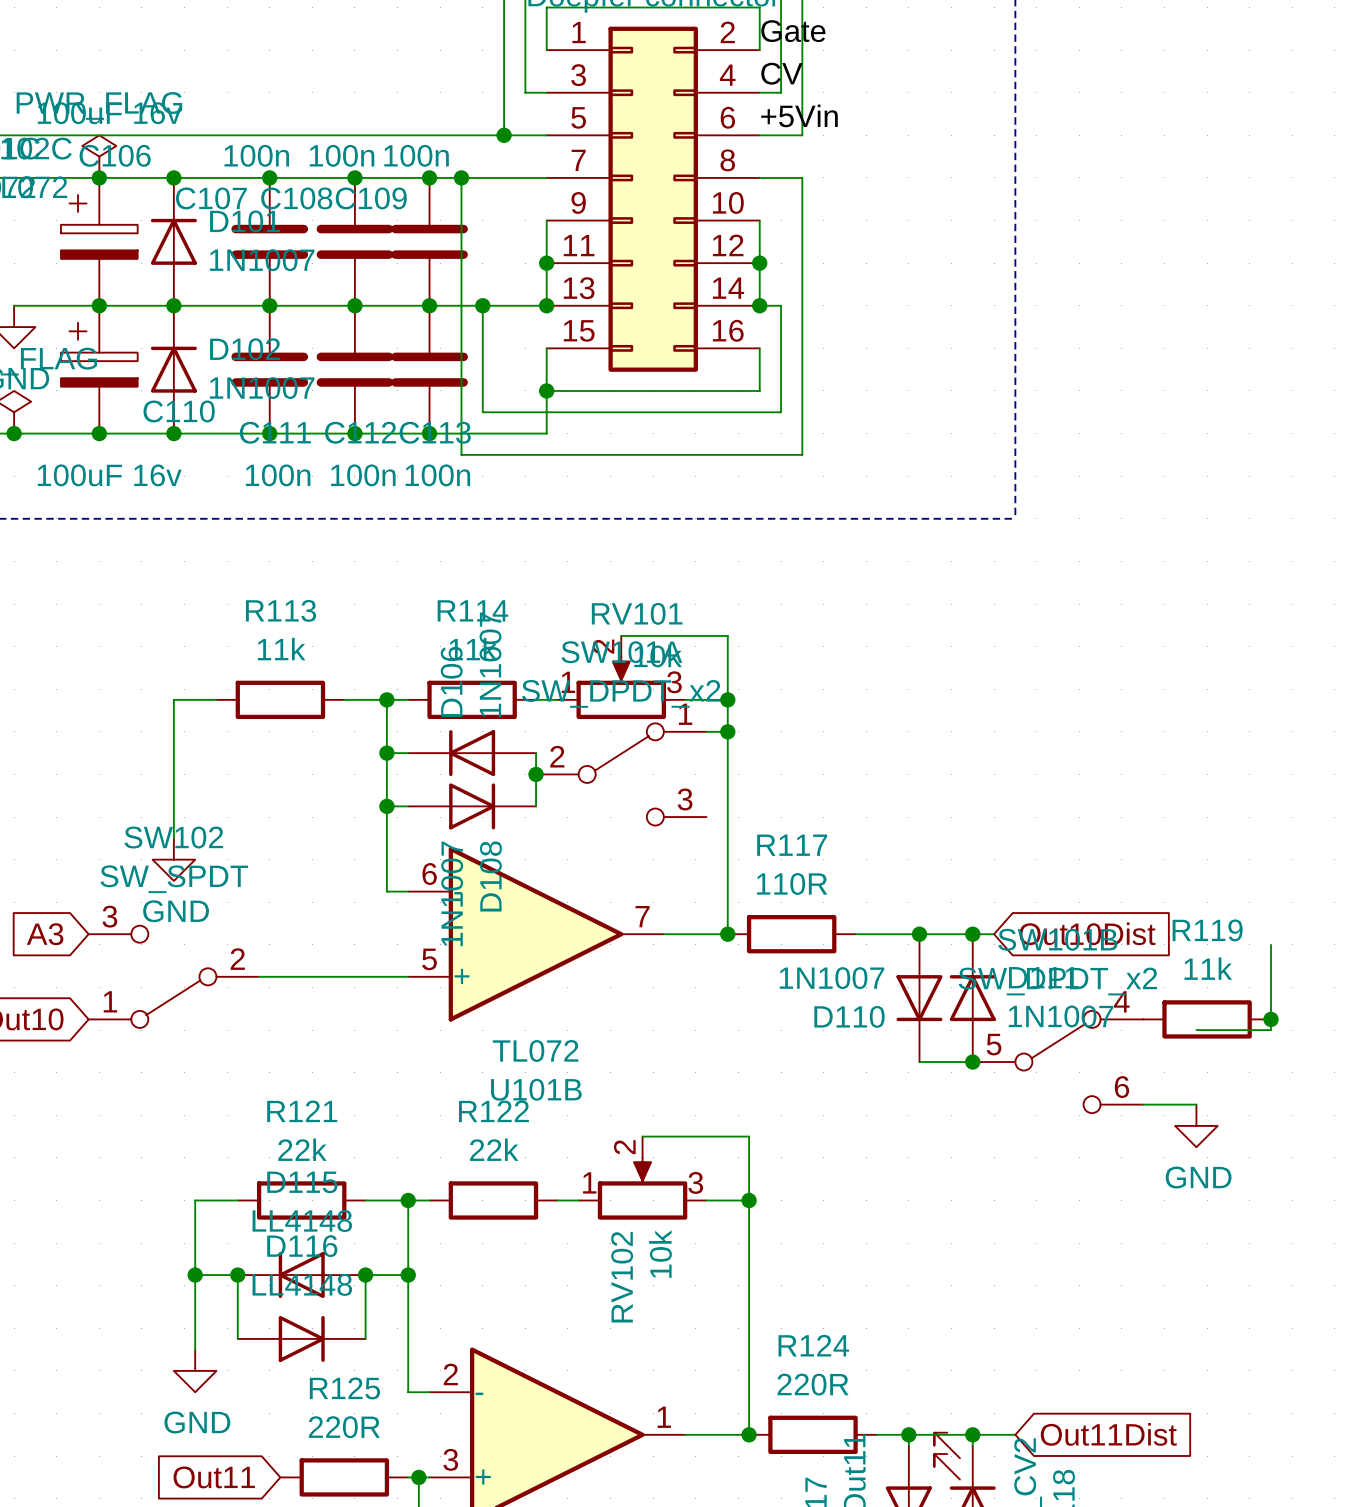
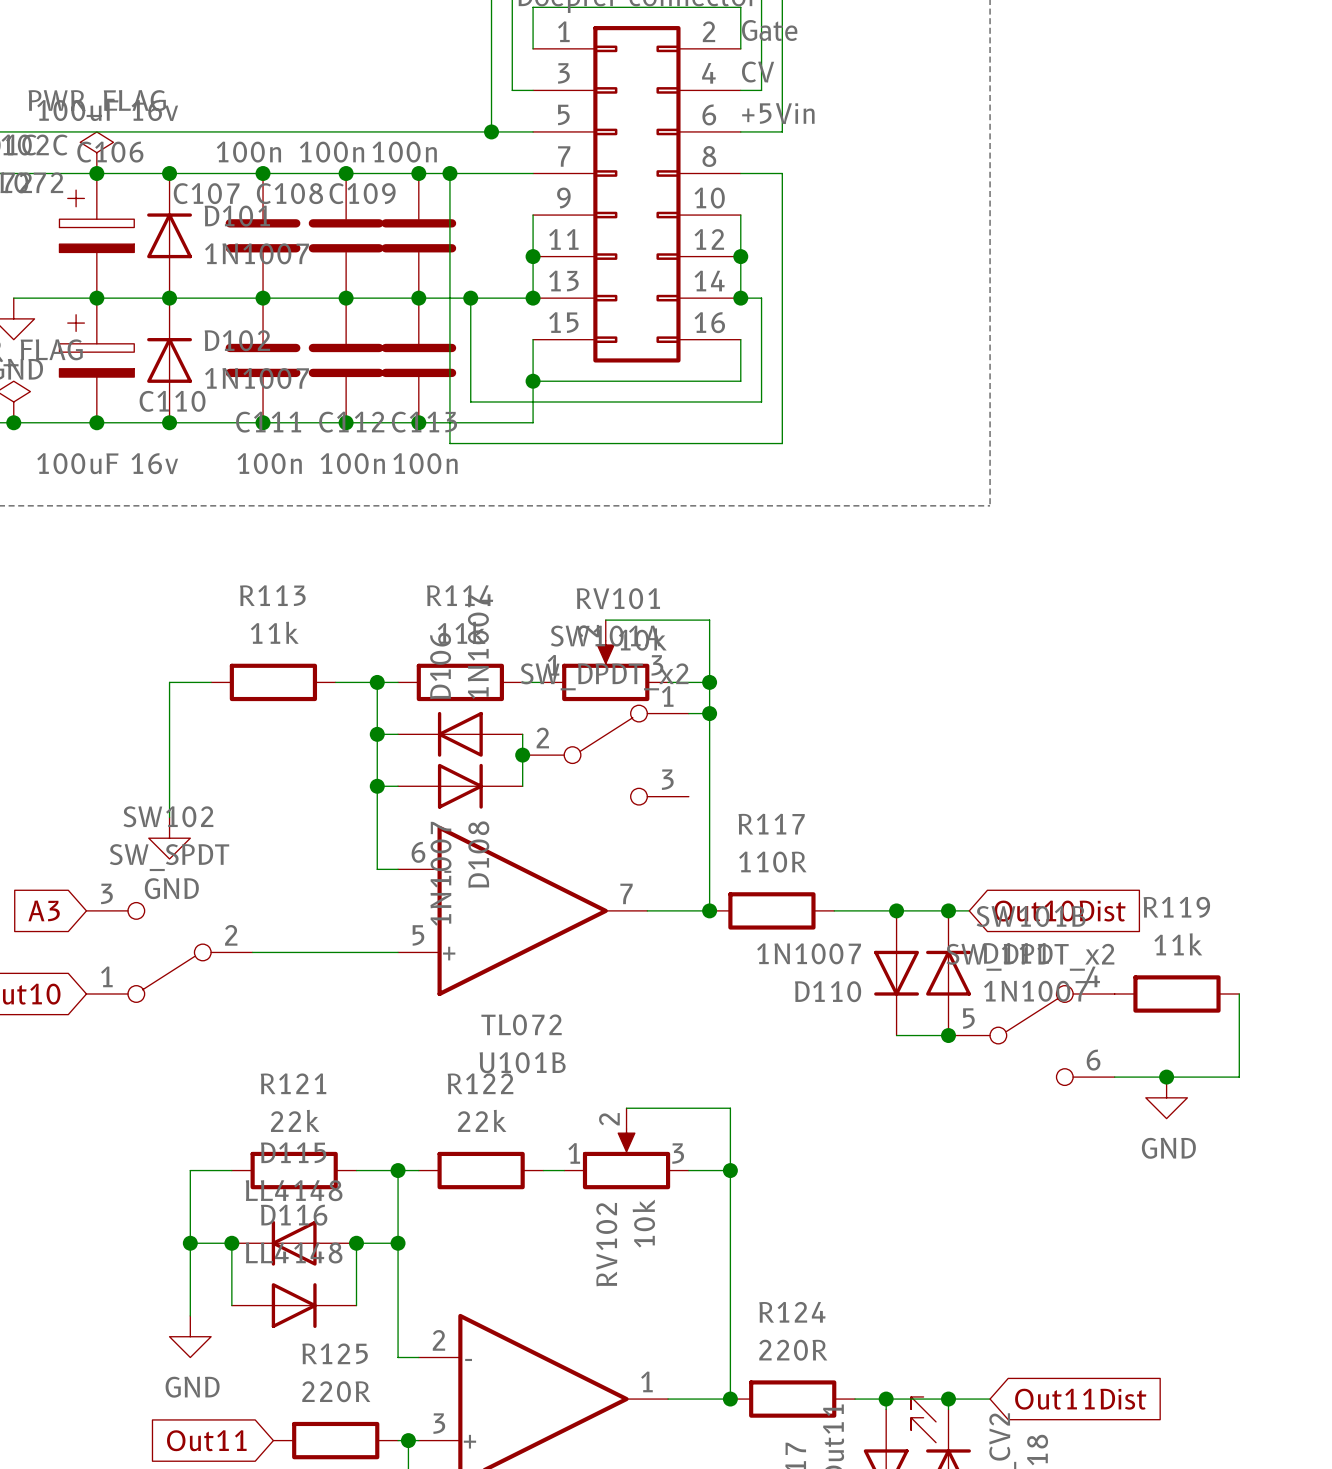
wire: (1271, 944) (1271, 1019) -> none
junction: (1271, 1019) -> none
wire: (1196, 1030) (1271, 1030) -> (1166, 1077) (1239, 1077) (1239, 1004)
junction: none -> (1166, 1077)

